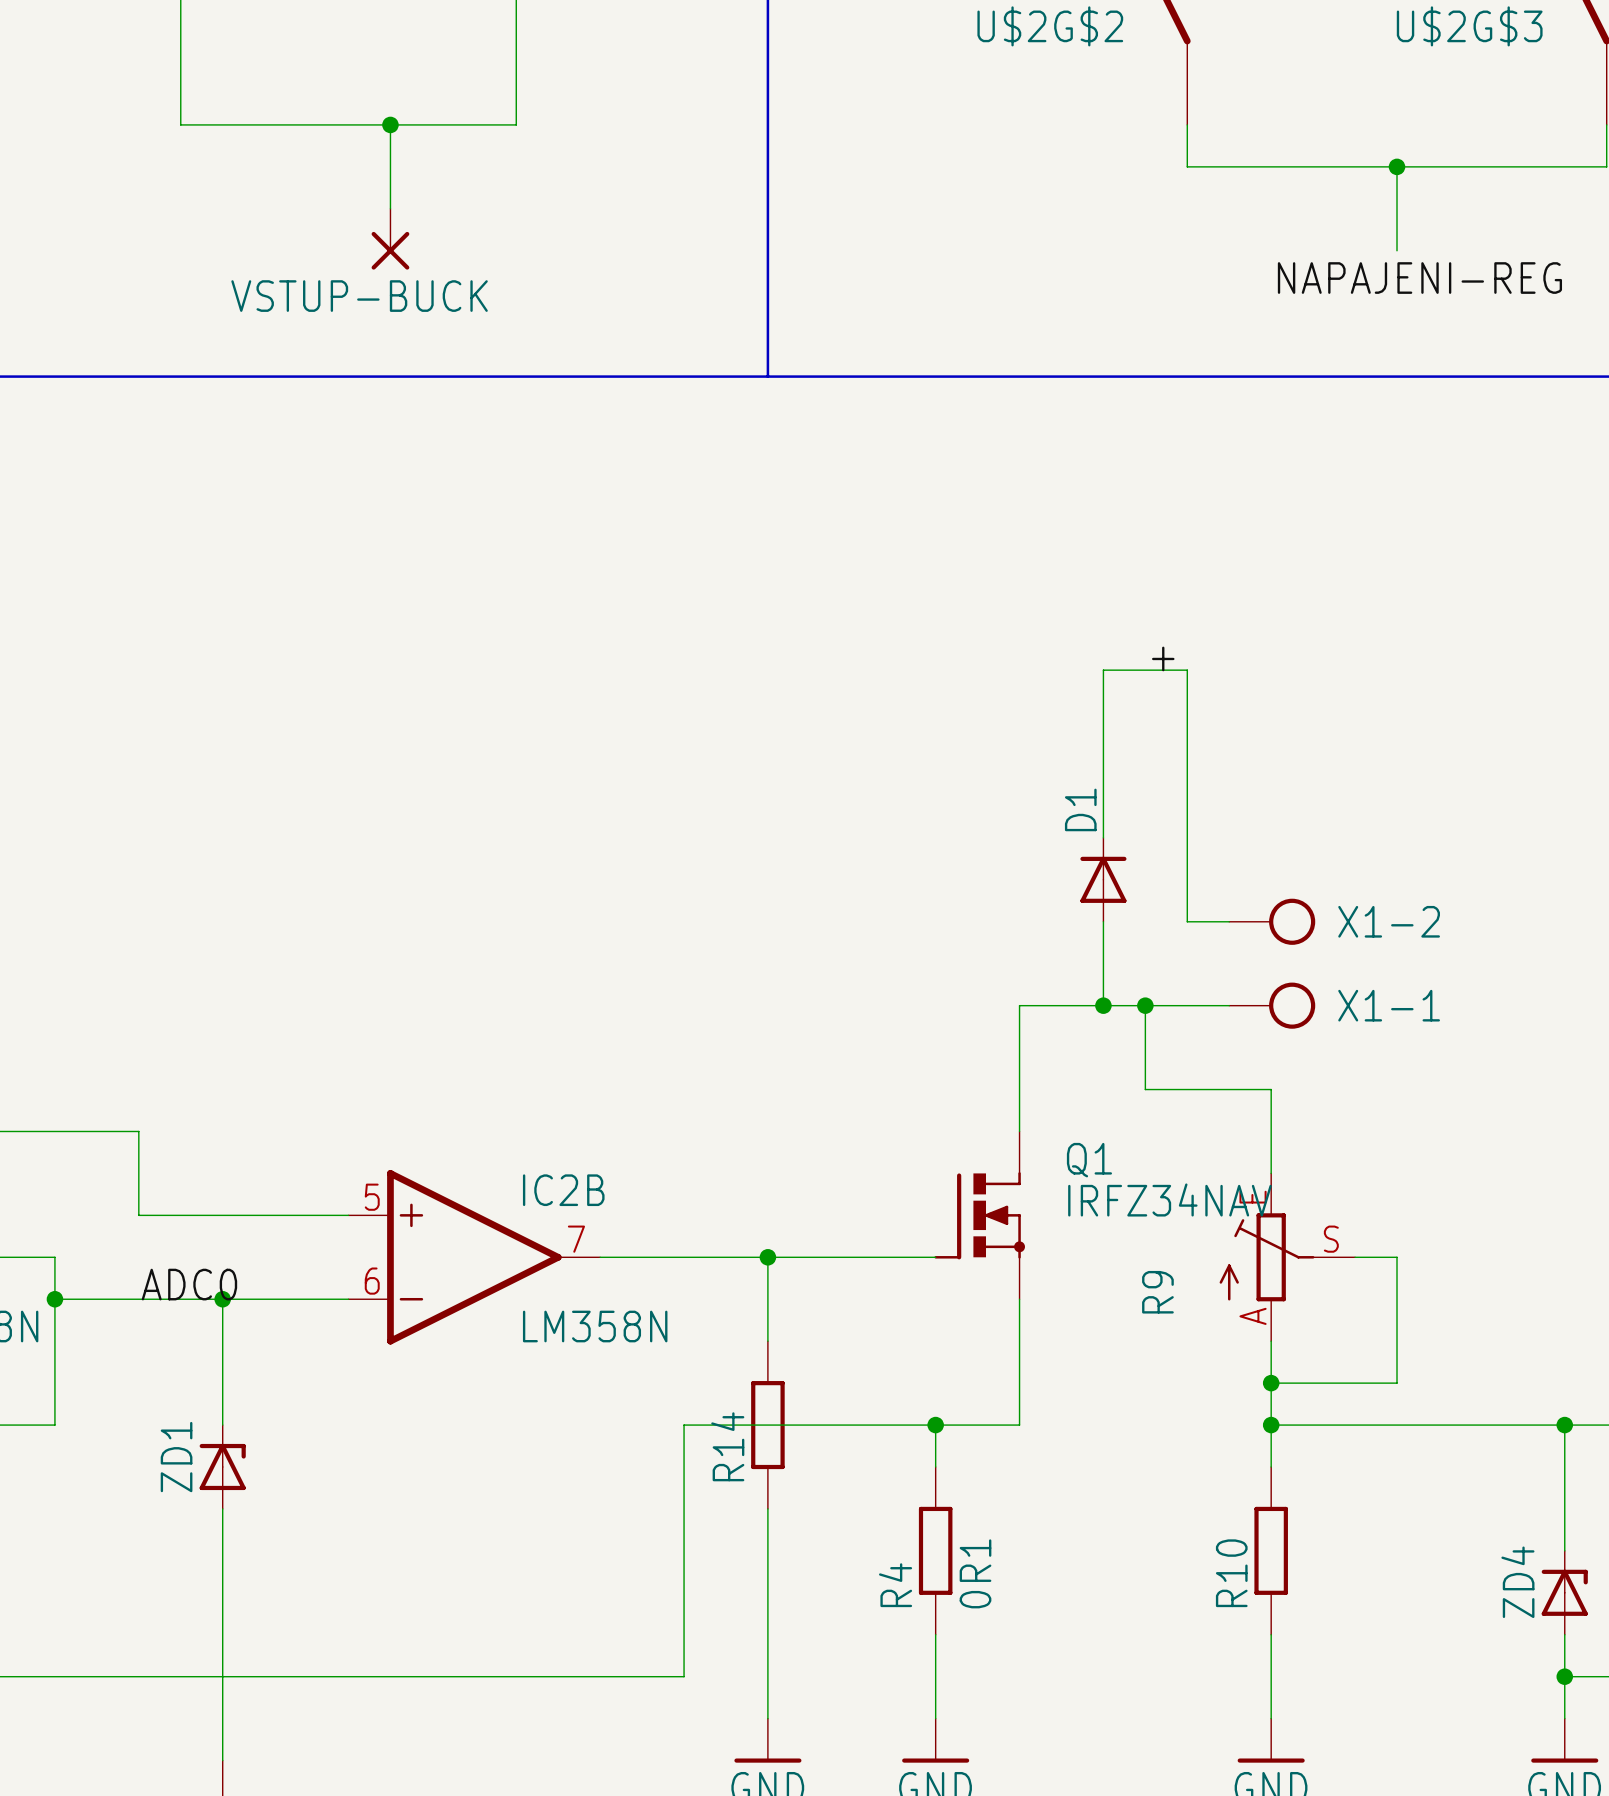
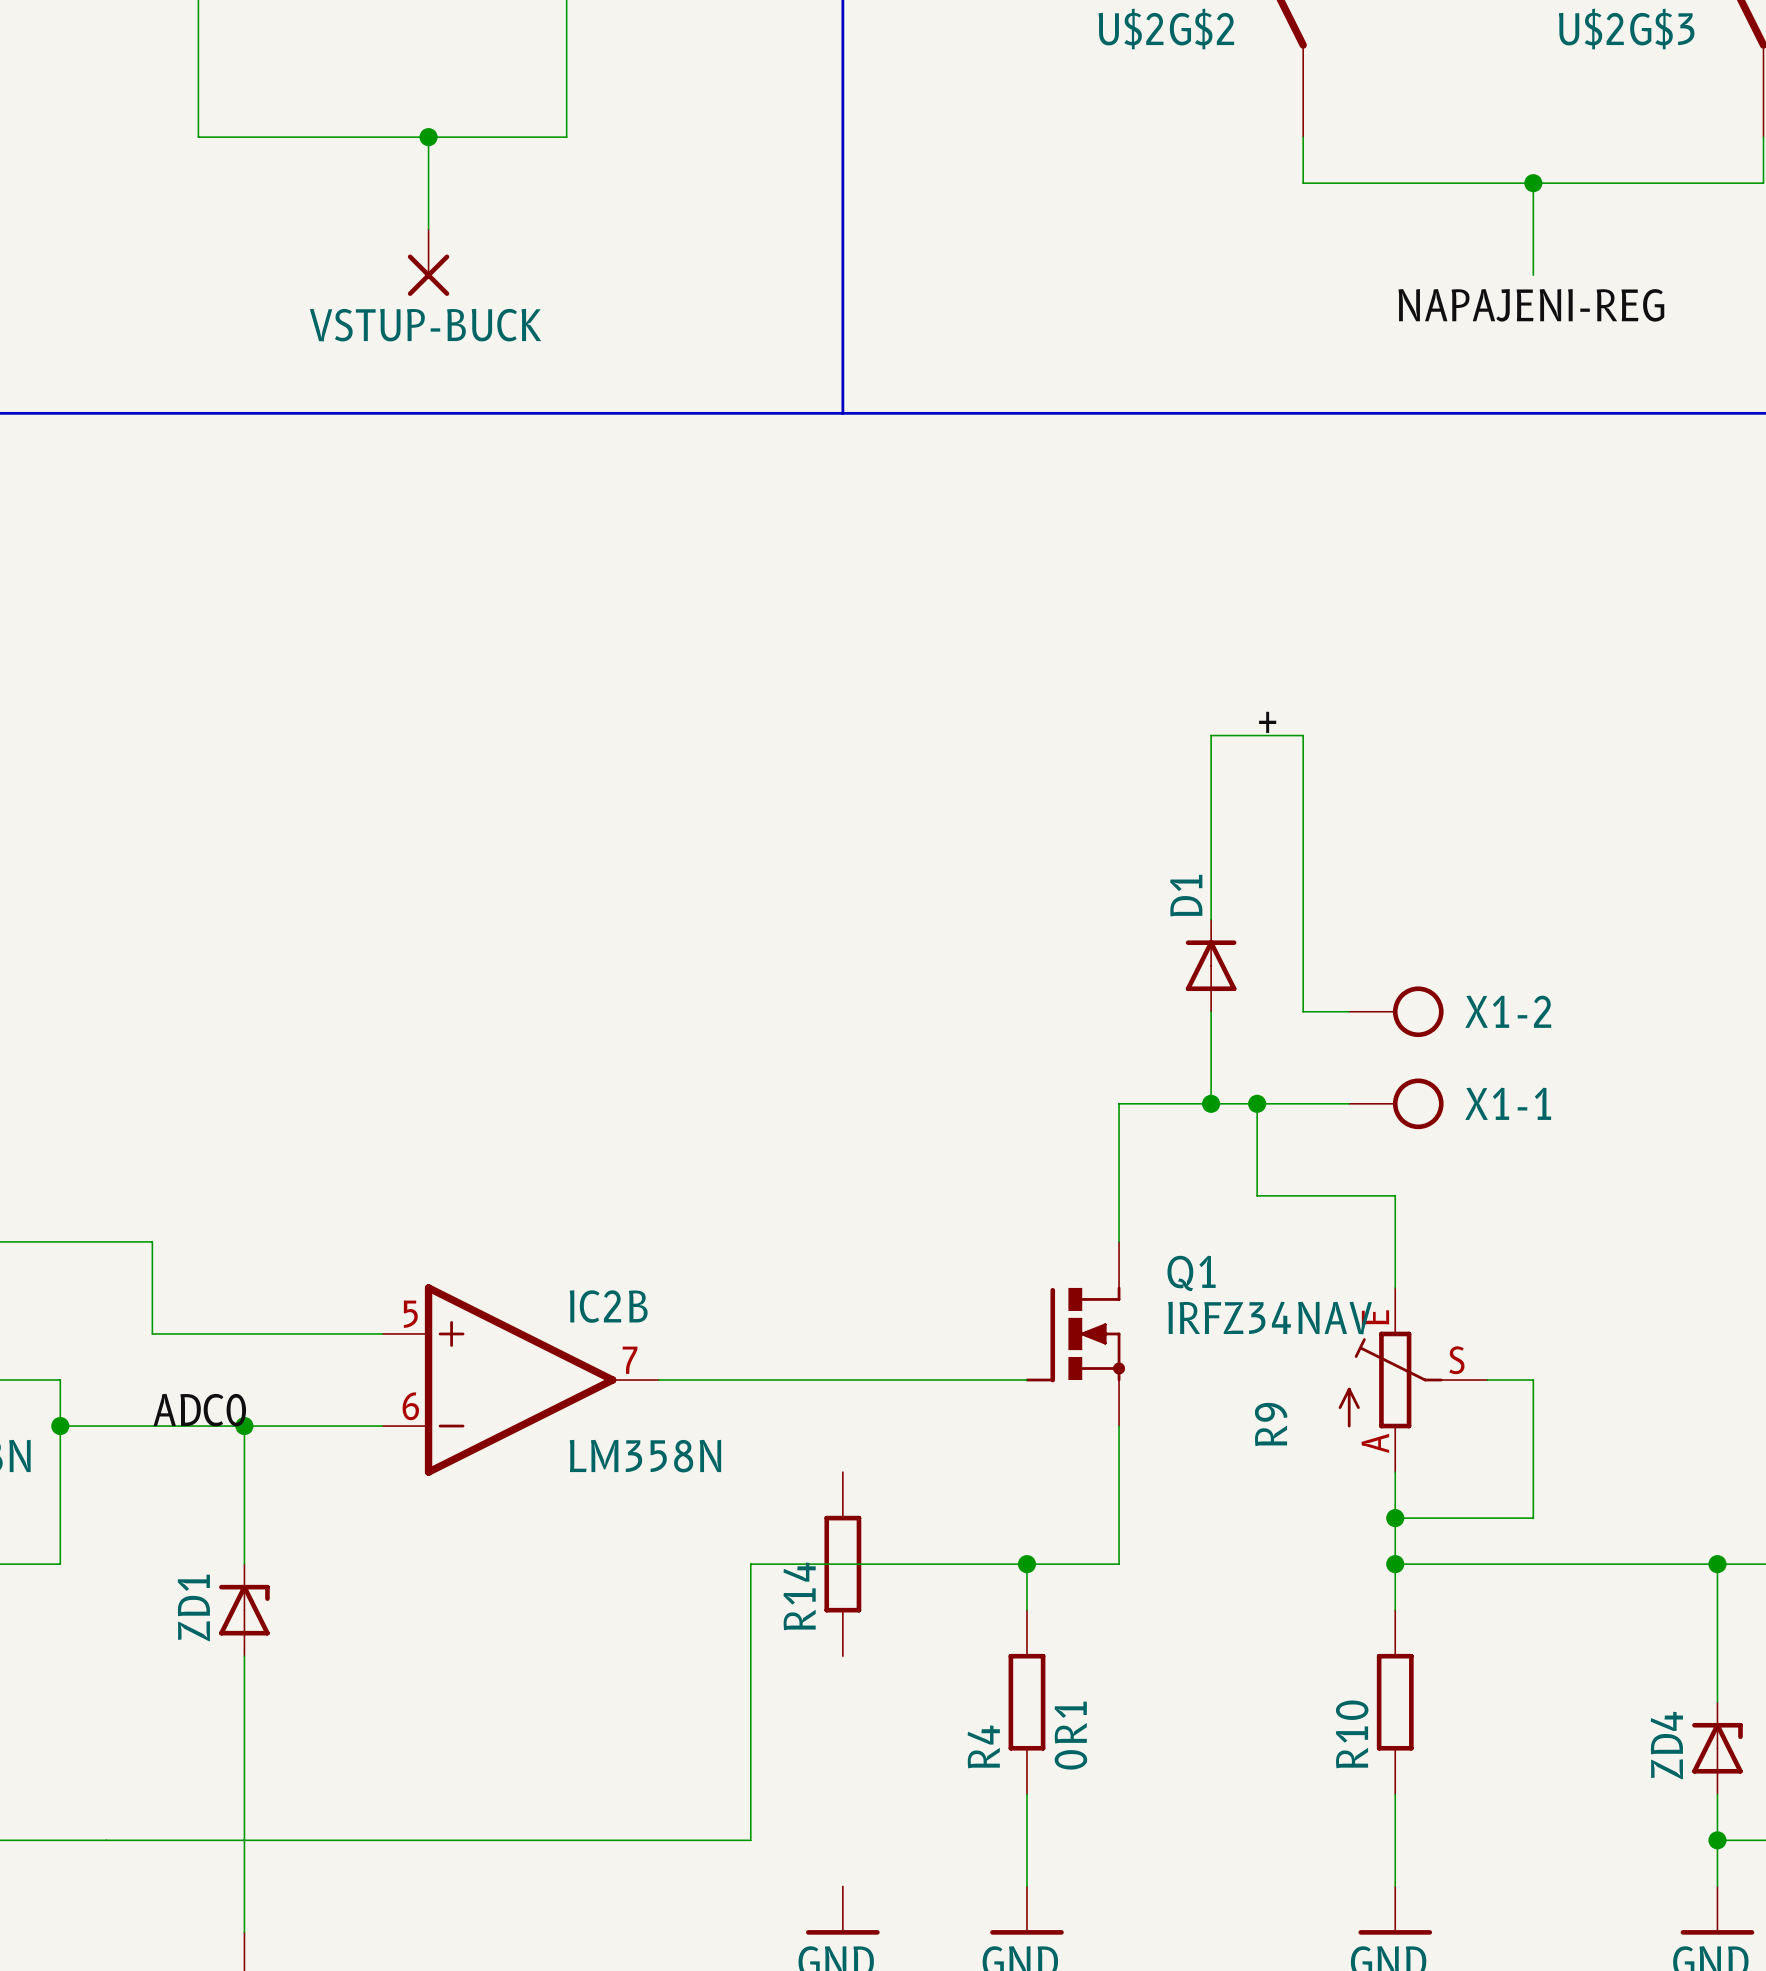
wire: (767, 1257) (767, 1341) -> none
junction: (767, 1257) -> none
wire: (767, 1508) (767, 1718) -> none

